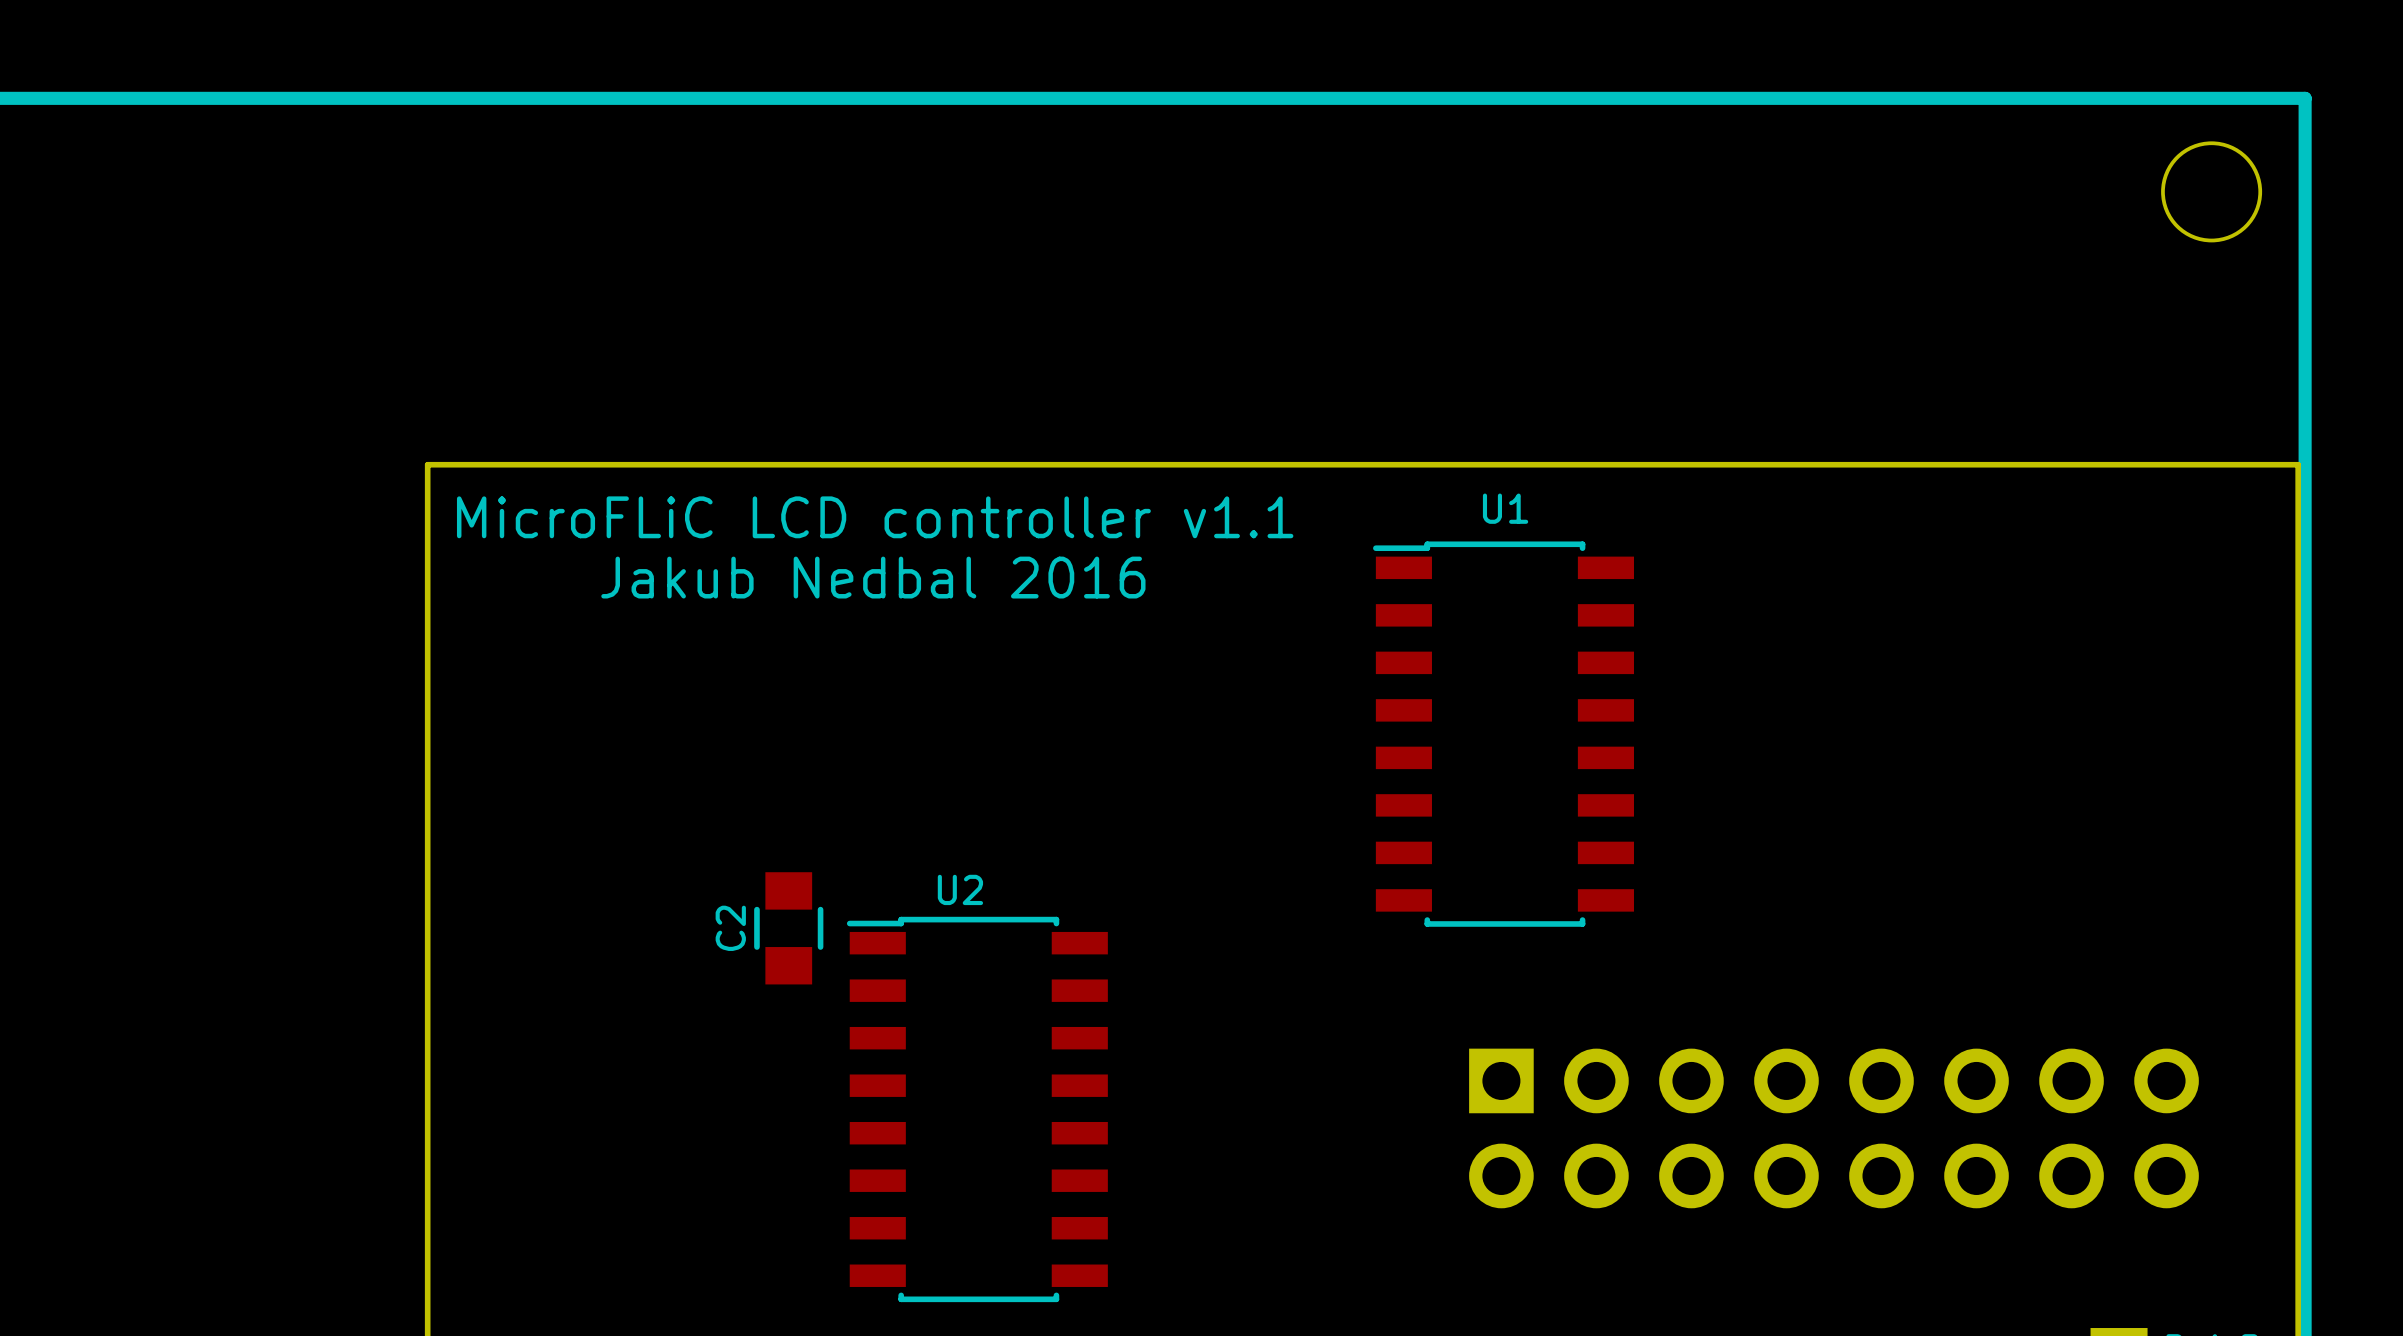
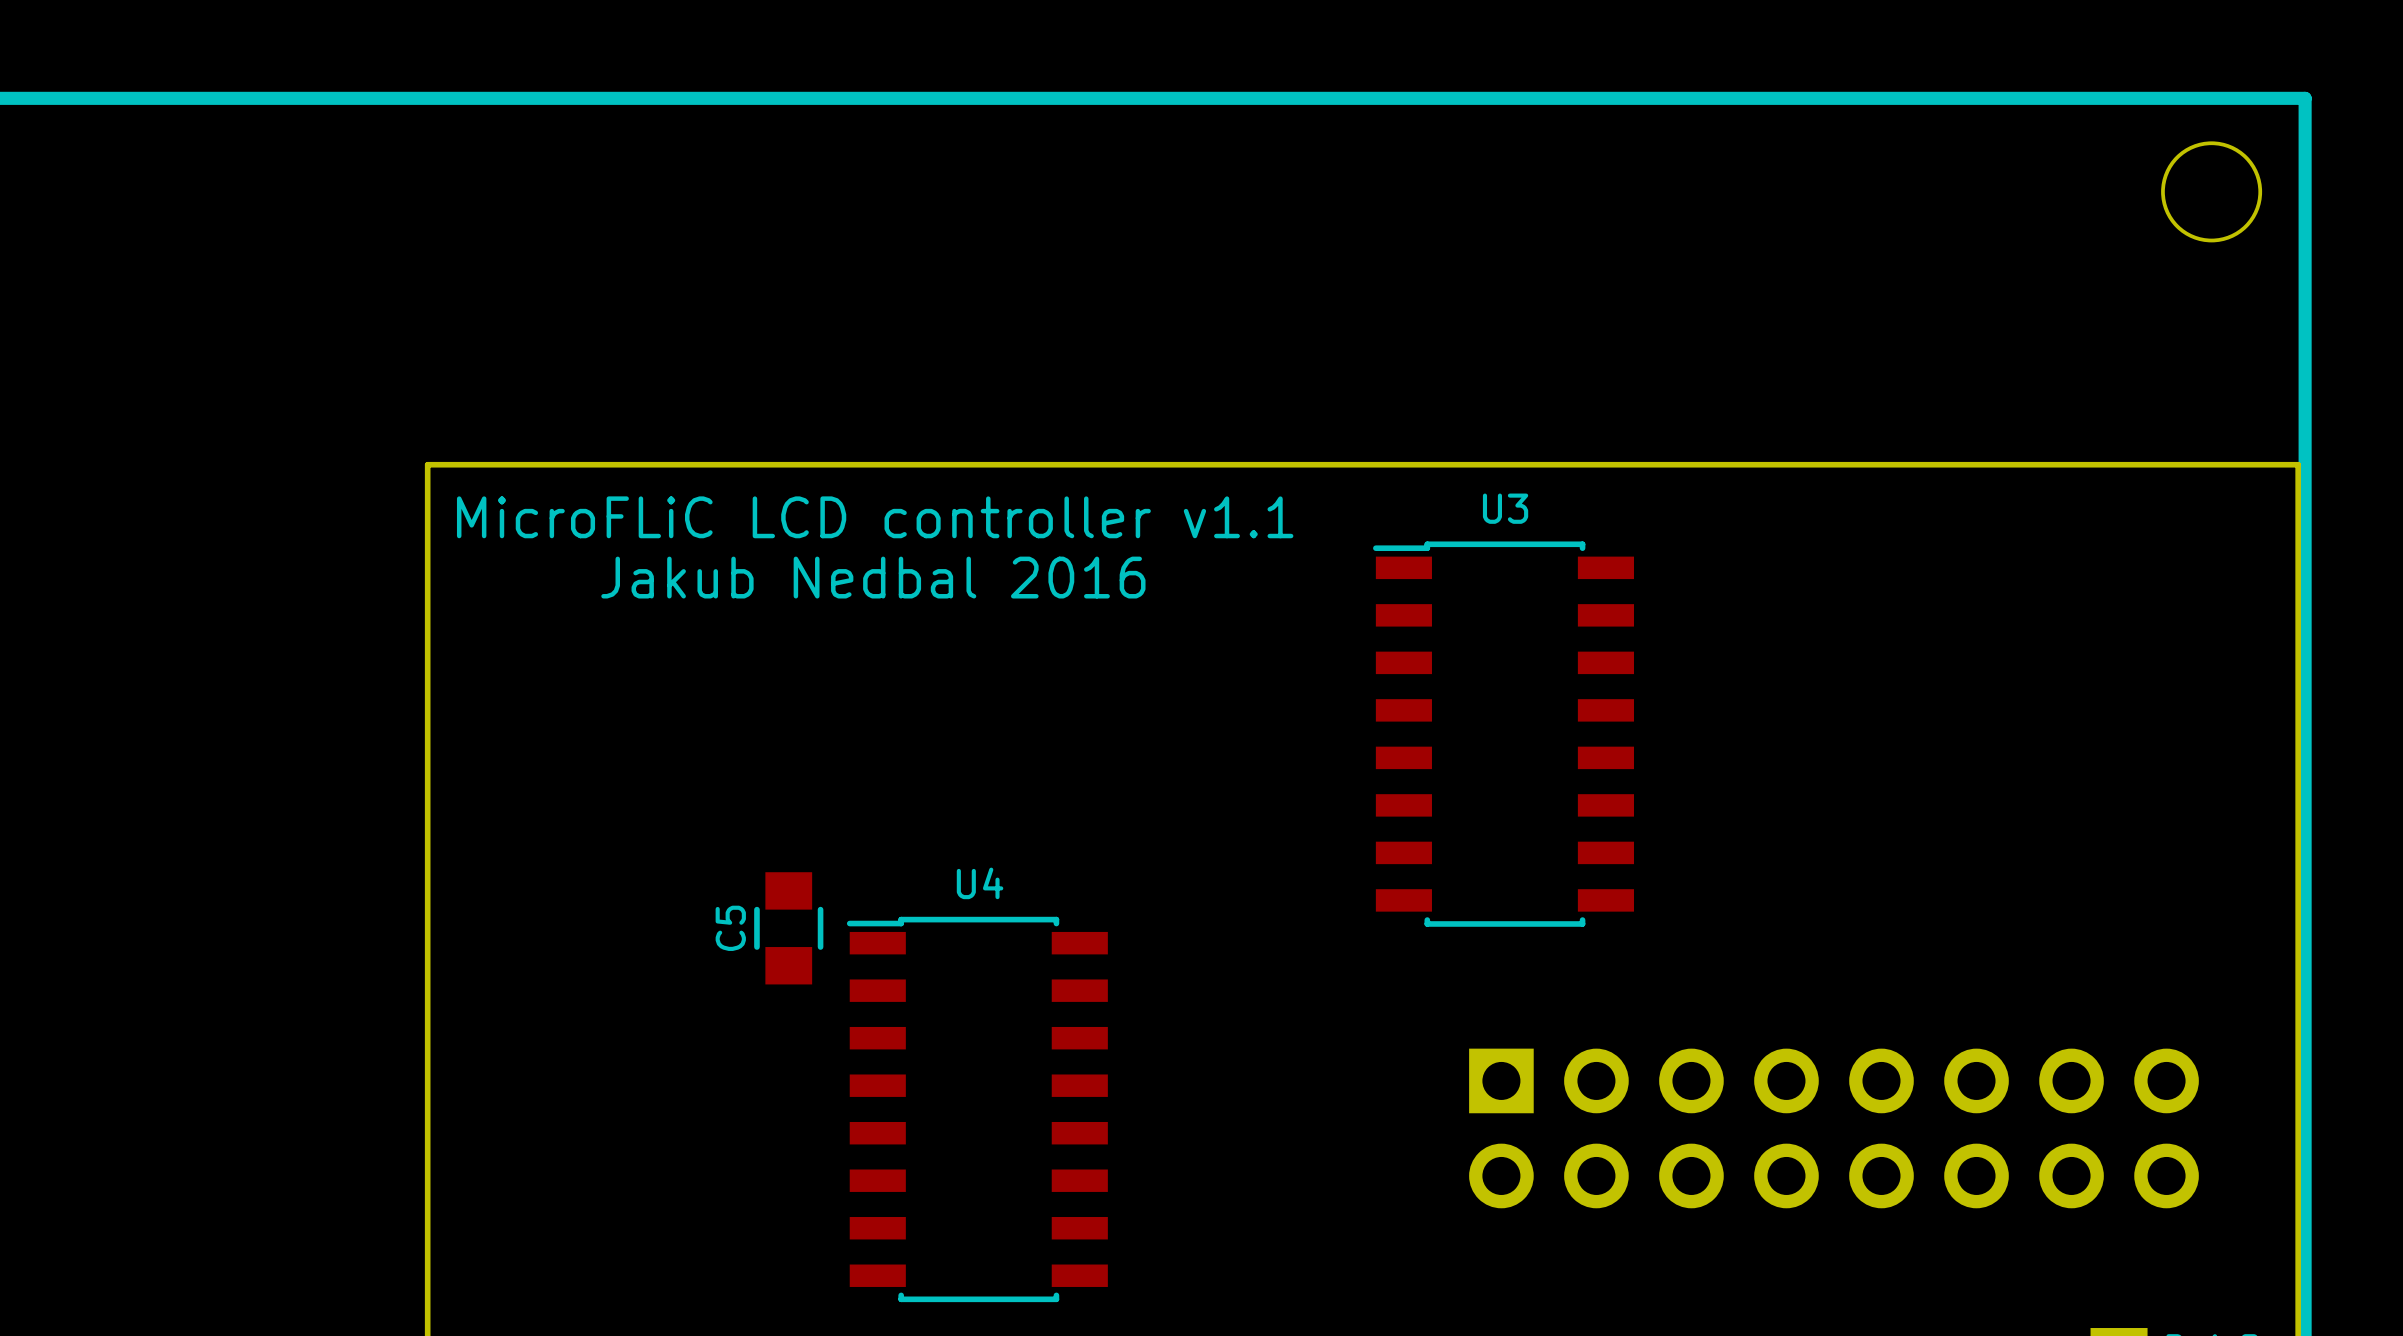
U1 name: U1 (1505, 508) -> U3 (1505, 508)
U2 name: U2 (960, 889) -> U4 (980, 883)
C2 name: C2 (730, 928) -> C5 (730, 928)

